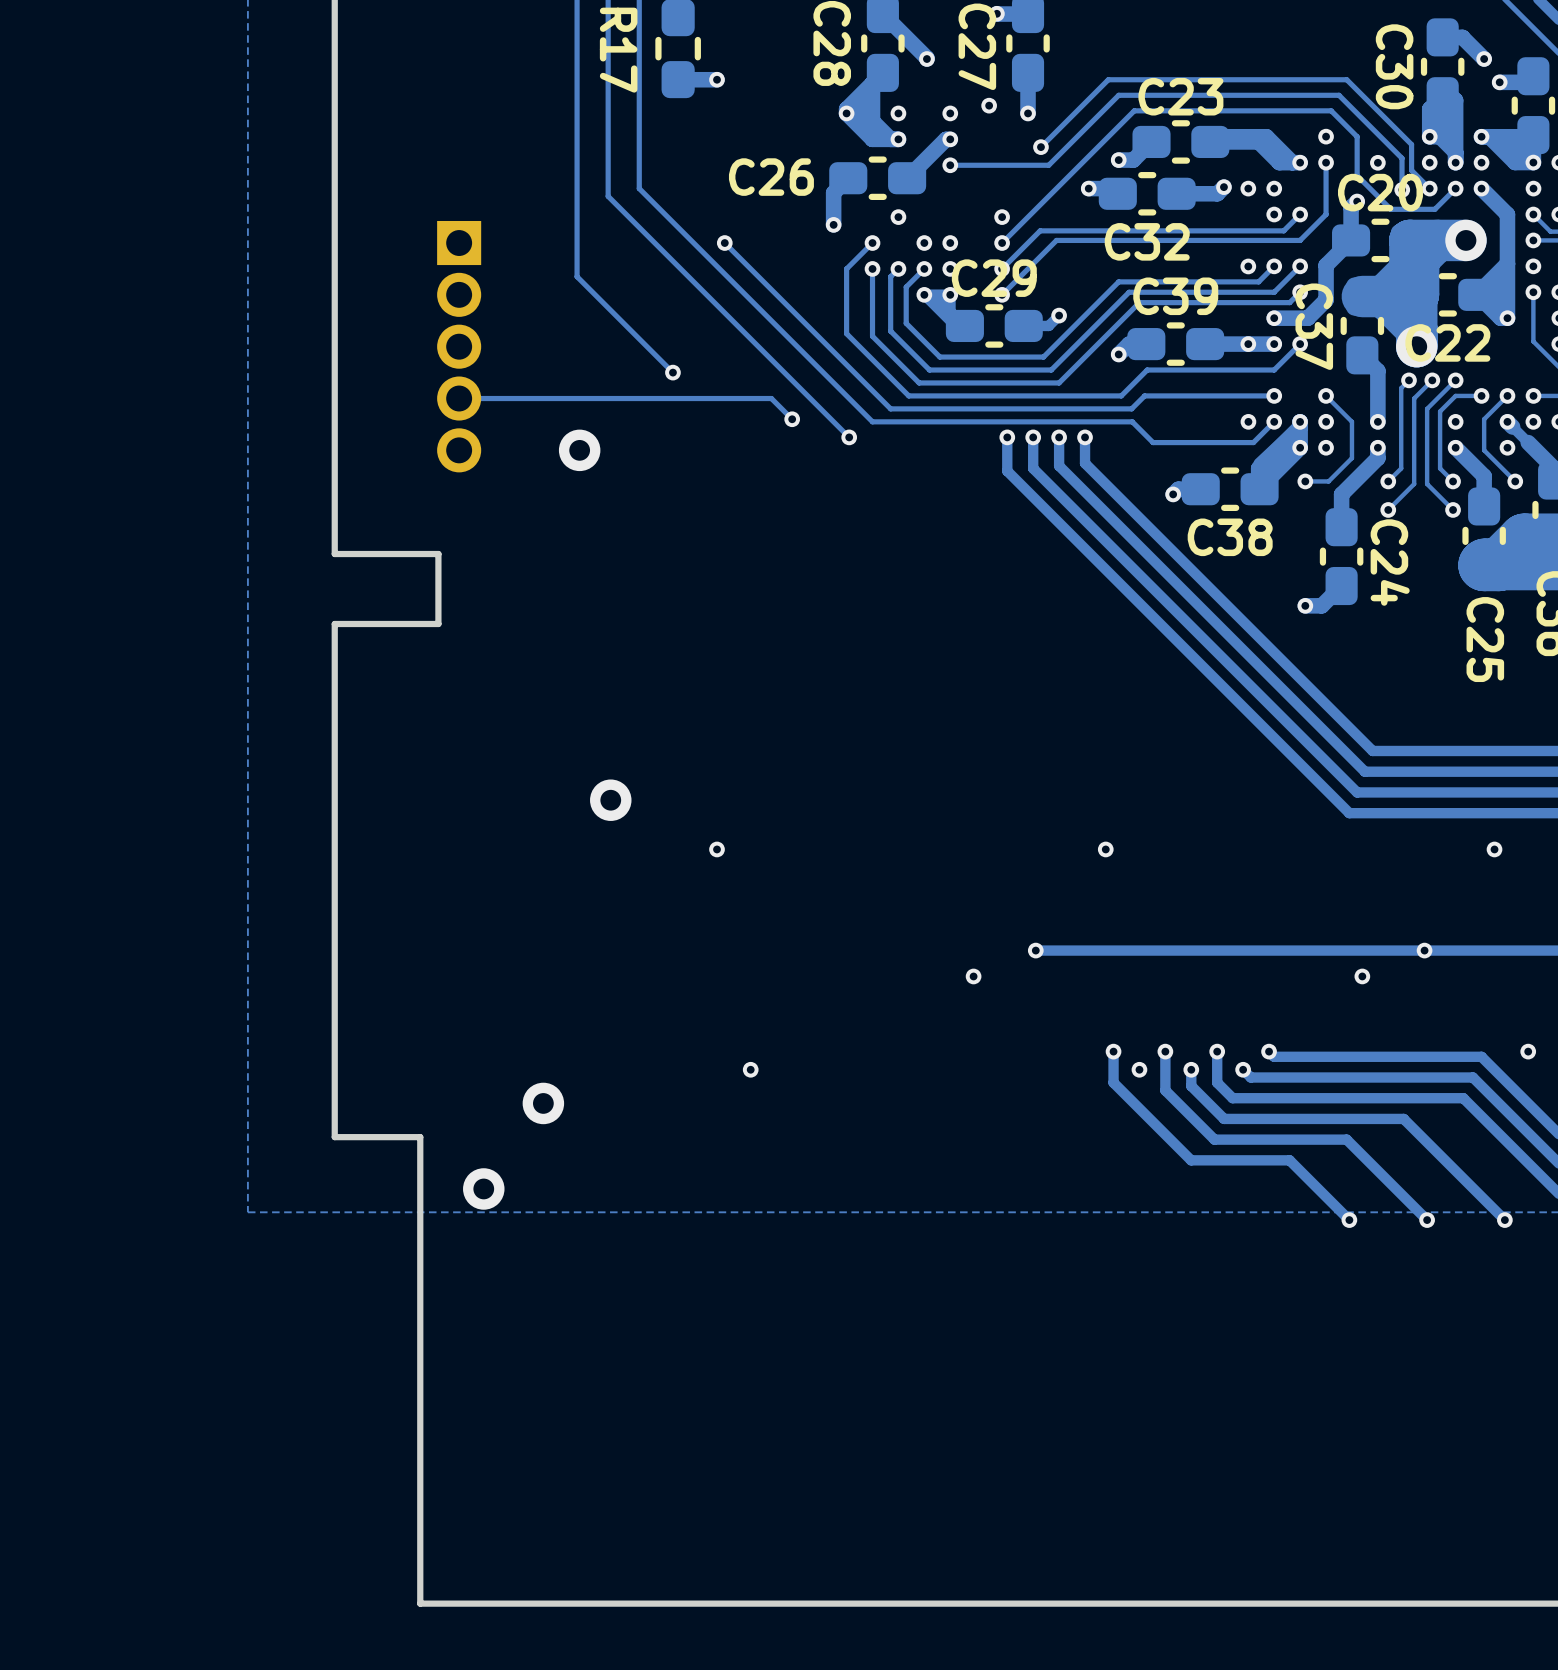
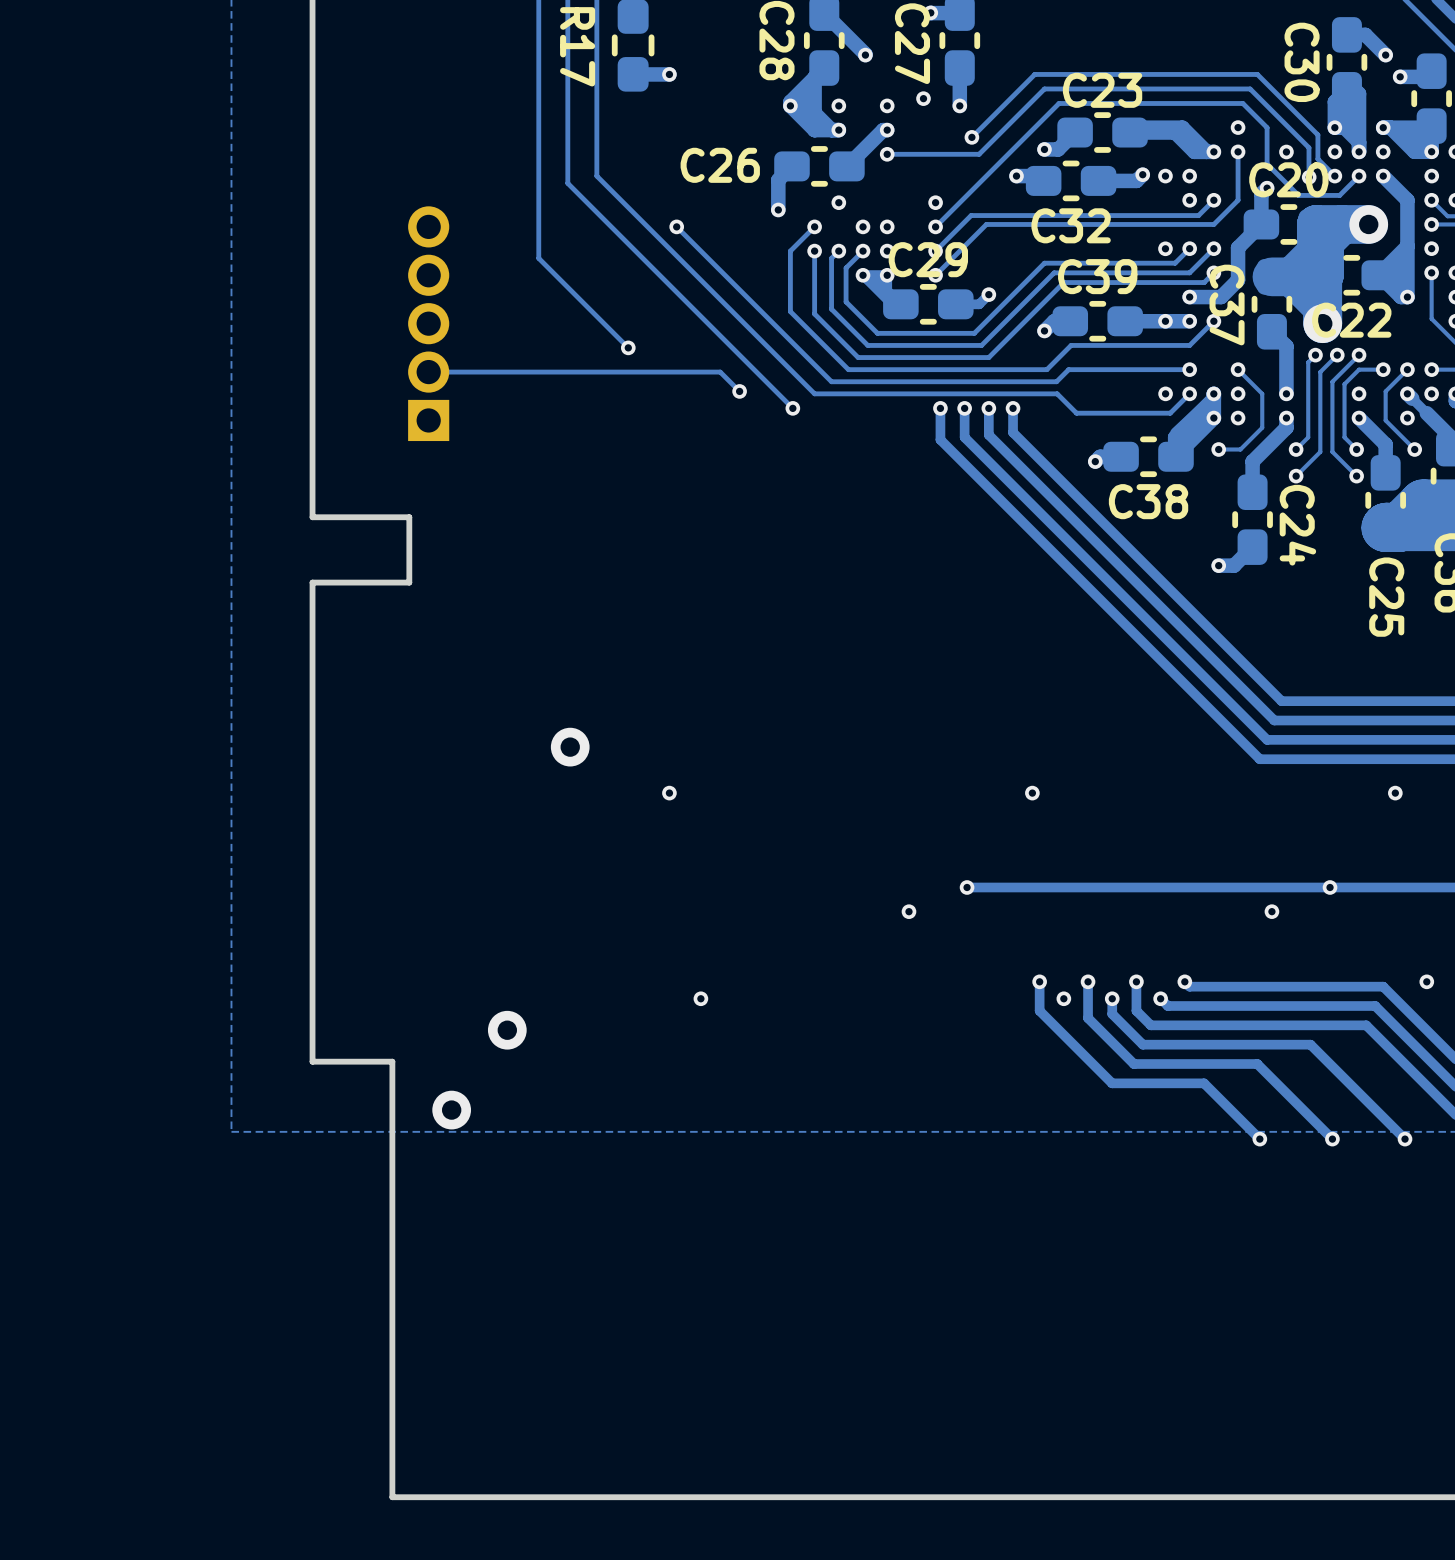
part rotation: 0° (459, 346) -> 180° (428, 323)
via: (579, 450) -> none

